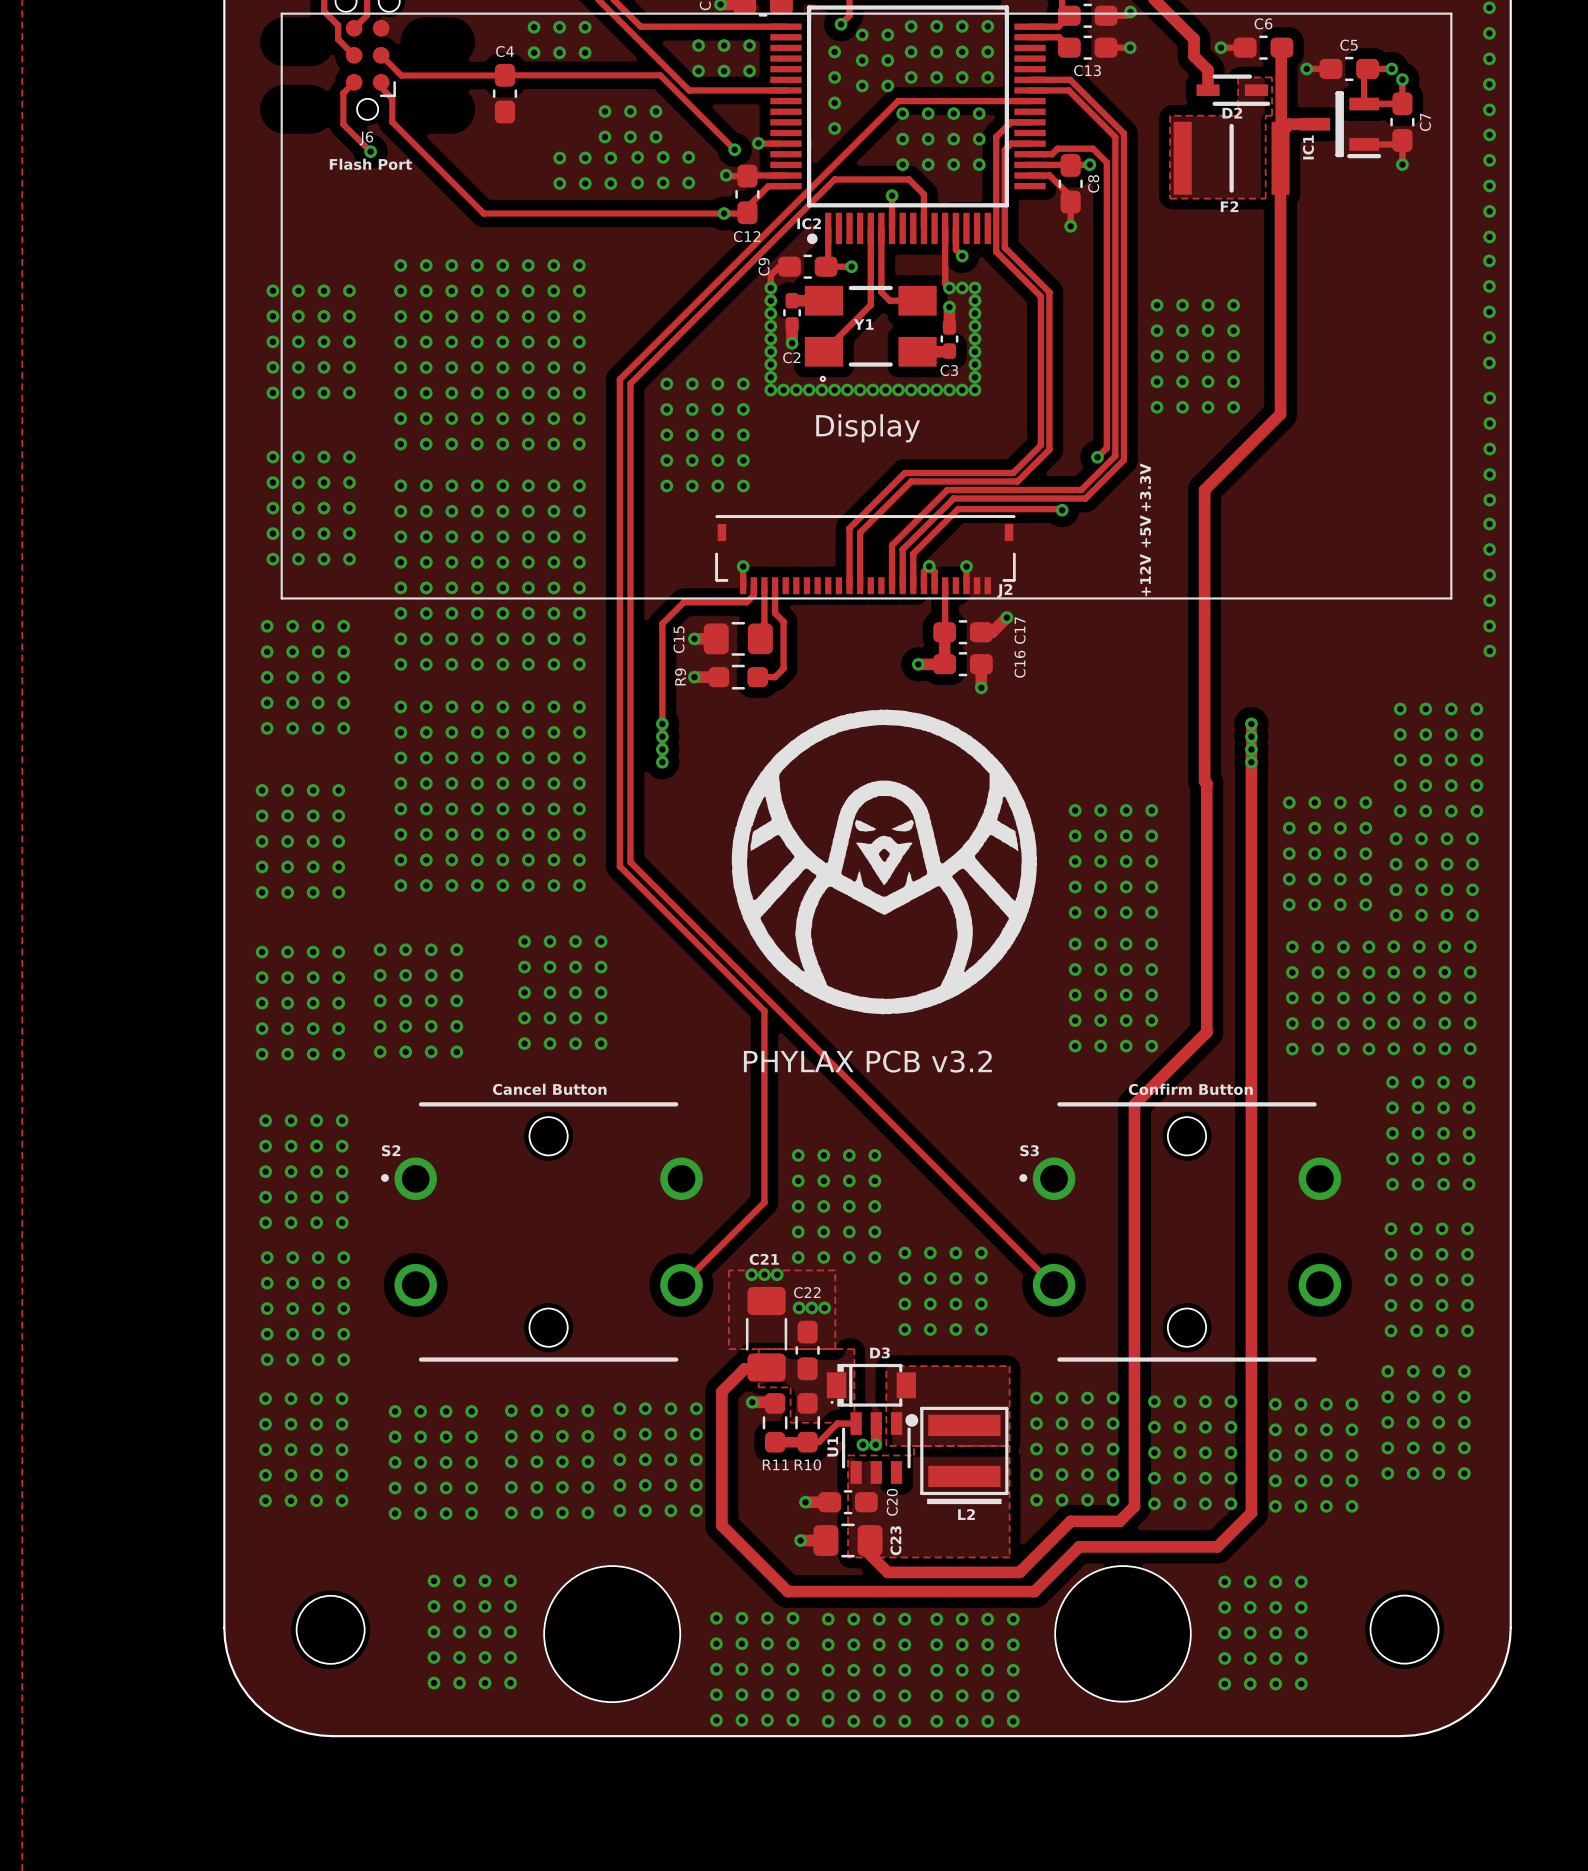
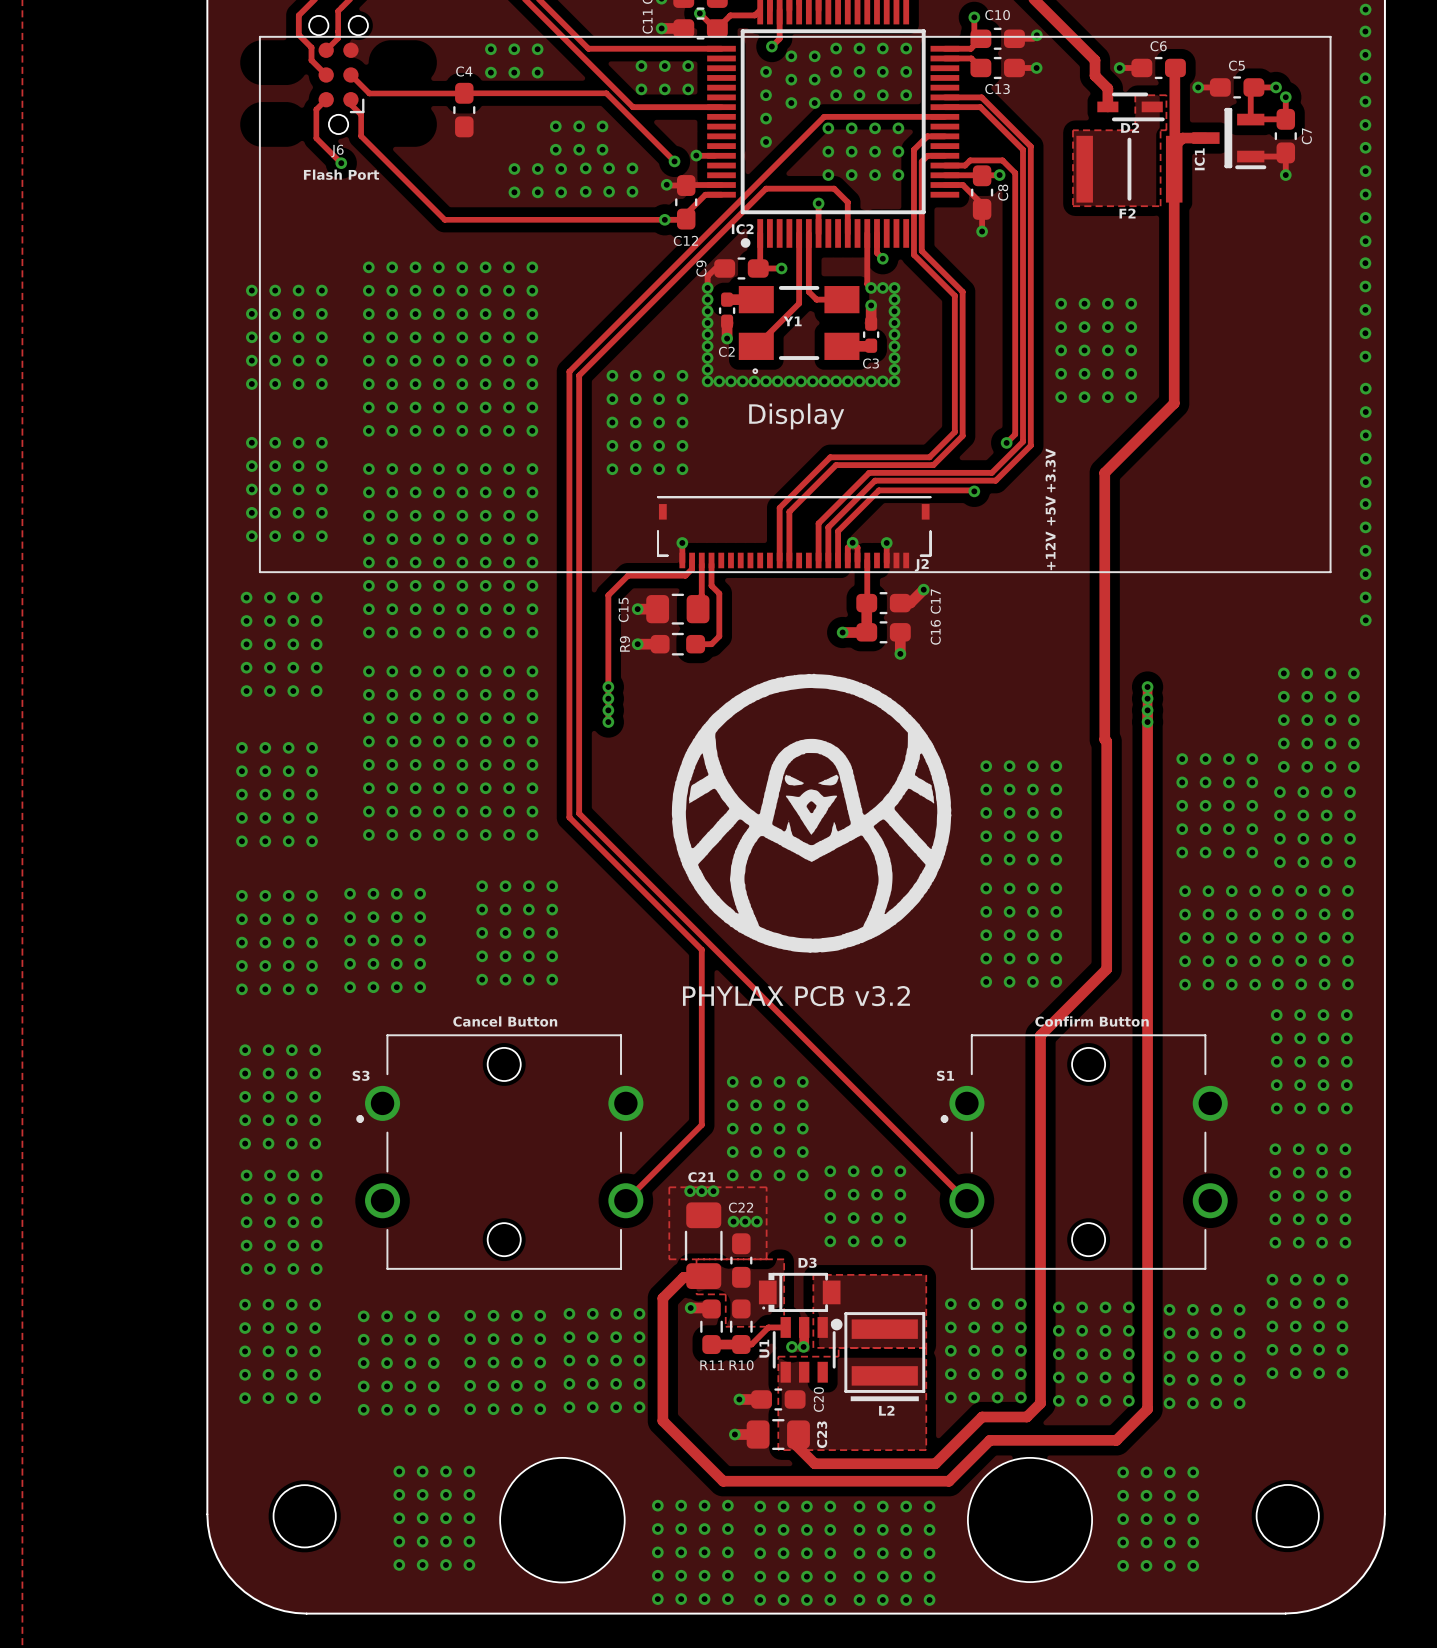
S3 footprint: [1019, 1102, 1342, 1362] -> [356, 1034, 644, 1270]
S2: (541, 1231) -> none
S1: none -> (1084, 1152)

